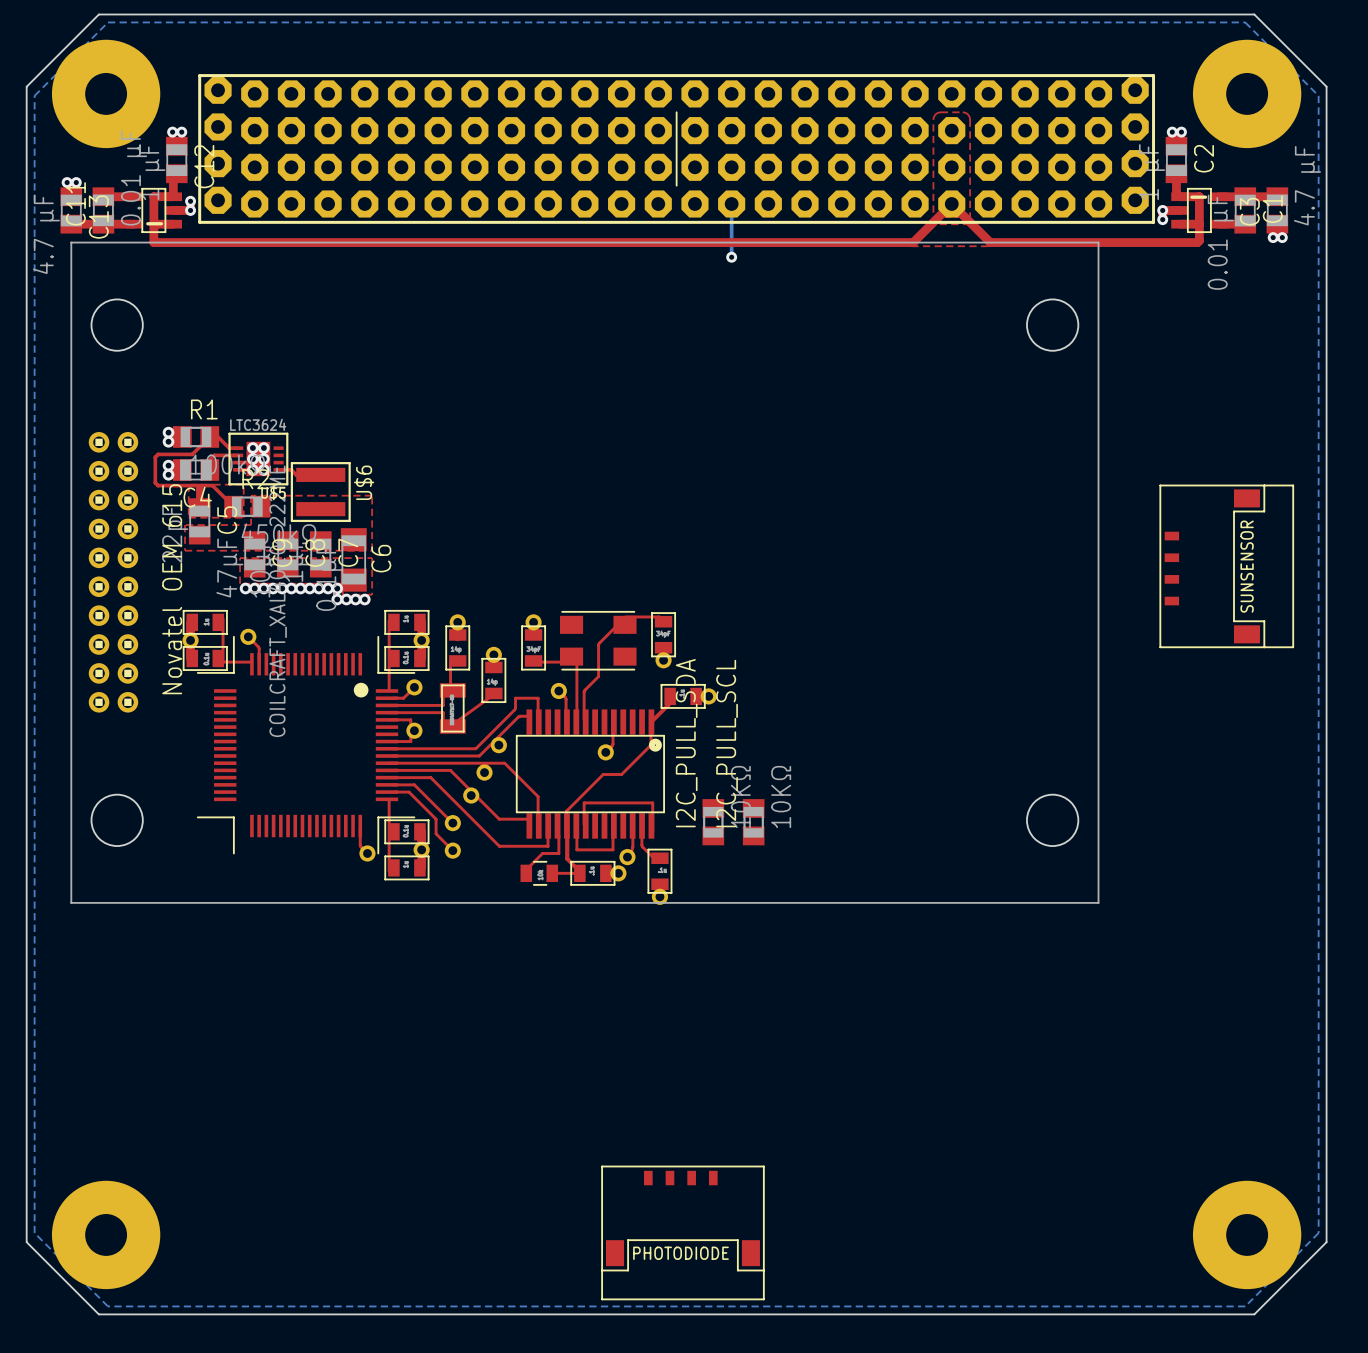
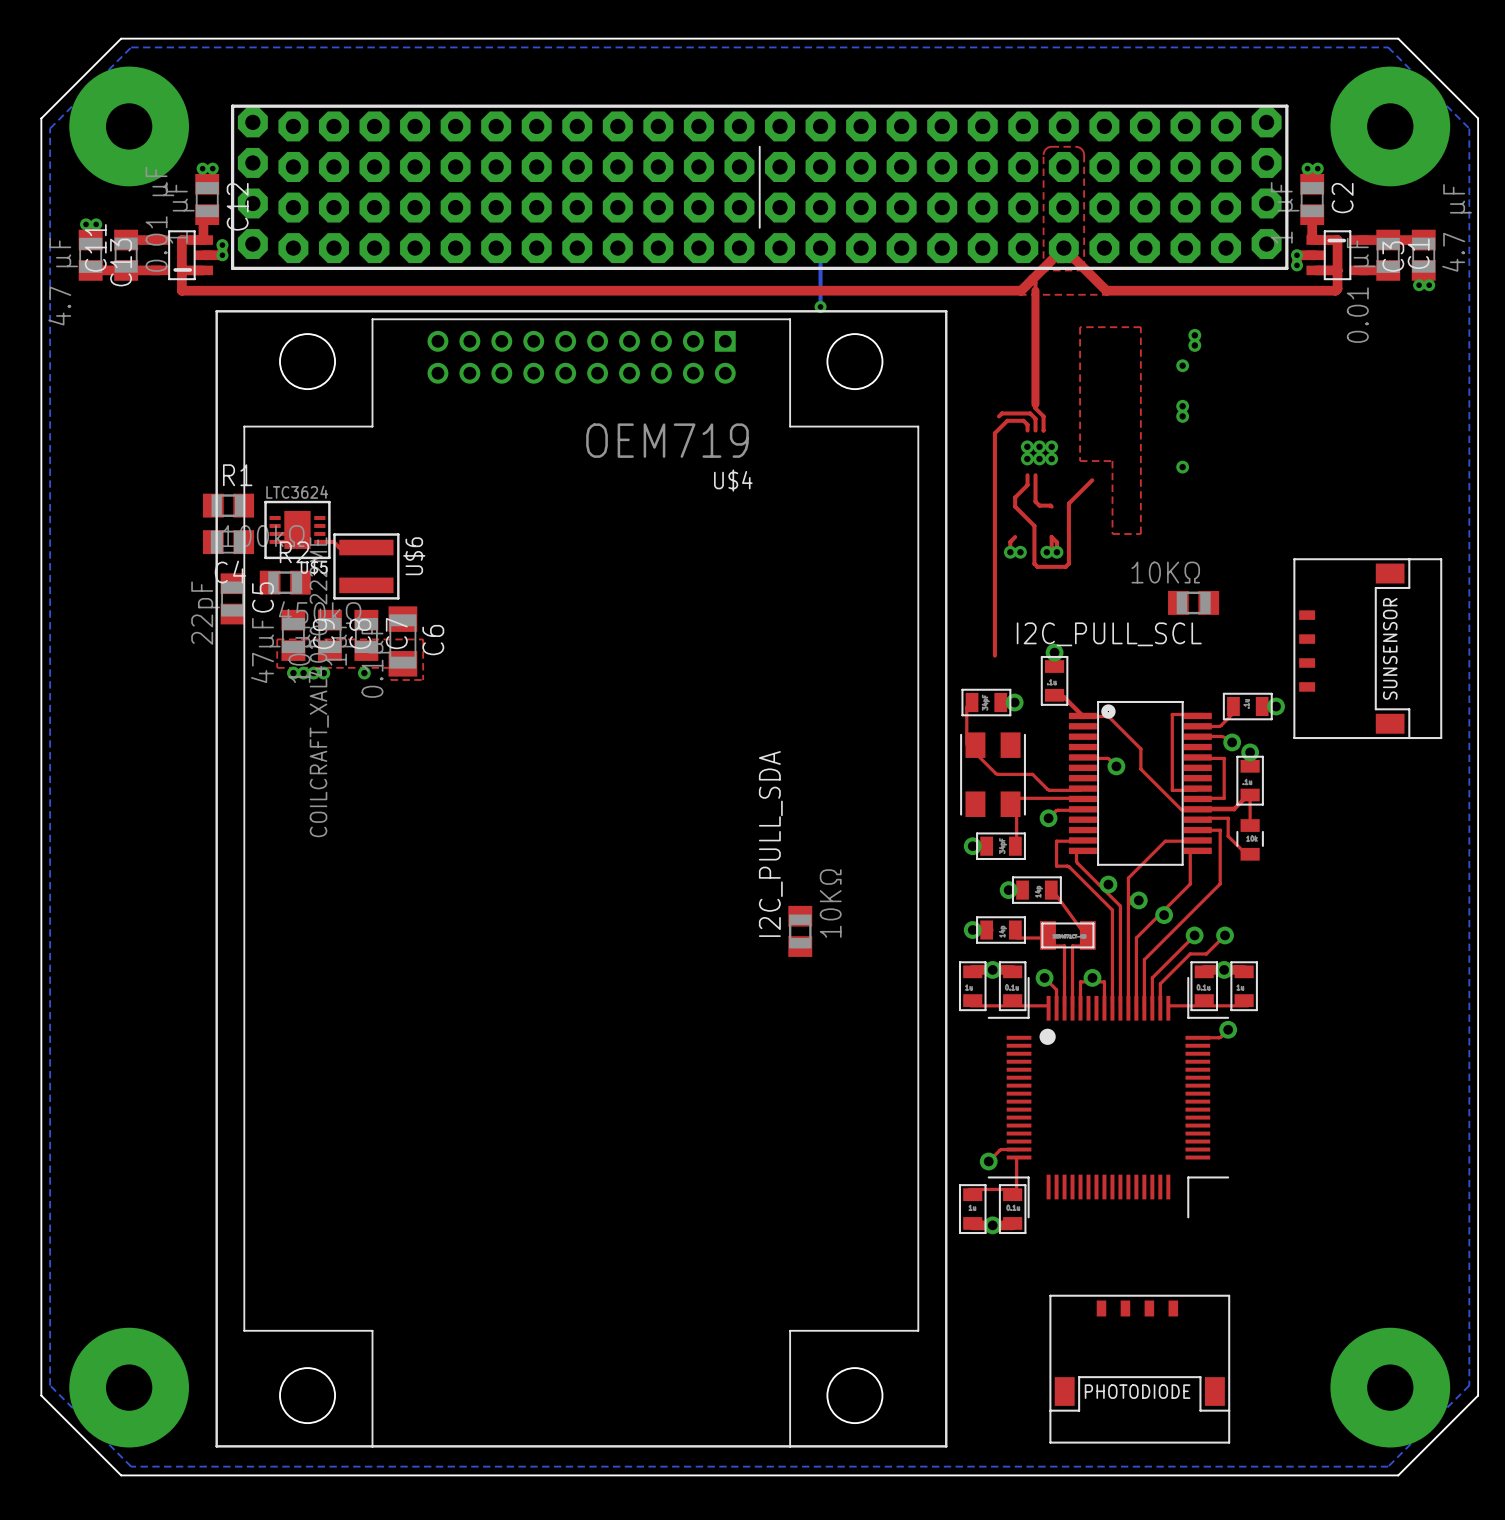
top track: none -> (1032, 279) (1035, 282) (1035, 408) (1043, 416) (1043, 430)
top zone outline: none -> (1080, 327) (1140, 327) (1140, 534) (1112, 534) (1112, 461) (1080, 461) (1080, 327)
via: none -> (1194, 335)
via: none -> (1194, 345)
via: none -> (1182, 365)
via: none -> (1182, 406)
top track: none -> (998, 416) (1001, 413) (1030, 413) (1035, 418) (1035, 430)
via: none -> (1182, 416)
top track: none -> (1027, 430) (1027, 424) (1023, 420) (1007, 420) (994, 433) (994, 655)
via: none -> (1027, 446)
via: none -> (1039, 446)
via: none -> (1051, 446)
via: none -> (1027, 458)
via: none -> (1039, 458)
via: none -> (1051, 458)
via: none -> (1182, 467)
top track: none -> (1027, 475) (1027, 485) (1015, 497) (1015, 506) (1034, 525) (1034, 563) (1037, 566) (1065, 566) (1068, 563) (1068, 503) (1092, 480)
top track: none -> (1035, 475) (1035, 501) (1039, 505) (1051, 506)
via: (168, 432) -> none
via: (168, 441) -> none
top track: (238, 448) (229, 448) (218, 436) (209, 436) (192, 454) (158, 454) (155, 457) (155, 482) (158, 485) (212, 485) (233, 506) -> none
via: (252, 448) -> none
via: (263, 448) -> none
top track: (238, 455) (214, 455) (210, 459) (209, 470) -> none
via: (252, 459) -> none
via: (263, 459) -> none
via: (168, 465) -> none
top track: none -> (1015, 537) (1010, 541) (1010, 552) (1020, 552)
via: (252, 470) -> none
via: (263, 470) -> none
via: (168, 474) -> none
via: none -> (1010, 552)
via: none -> (1020, 552)
top track: none -> (1046, 552) (1051, 547) (1051, 537) (1056, 542) (1056, 552)
via: none -> (1046, 552)
via: none -> (1056, 552)
top zone outline: (188, 484) (243, 484) (243, 517) (188, 517) (188, 484) -> none
top track: (201, 485) (199, 487) (199, 507) -> none
top zone outline: (251, 495) (372, 495) (372, 550) (185, 550) (185, 525) (251, 525) (251, 495) -> none
part: (584, 572) -> none
via: (245, 588) -> none
via: (291, 588) -> none
via: (300, 588) -> none
via: (309, 588) -> none
via: (328, 588) -> none
via: (337, 588) -> none
via: (337, 599) -> none
via: (346, 599) -> none
via: (355, 599) -> none
via: (364, 599) -> none
top track: none -> (1054, 696) (1064, 696) (1084, 716) (1108, 716) (1140, 748) (1140, 769) (1181, 809) (1234, 809) (1247, 796) (1250, 796)
top track: (668, 696) (668, 705) (650, 723) (650, 745) (621, 774) (603, 774) (566, 811) (566, 858) (578, 873) -> none
I2C_PULL_SCL name position: I2C_PULL_SCL (727, 743) -> I2C_PULL_SCL (1109, 634)
part: (449, 757) -> none
U$4: none -> OEM719 (581, 878)
I2C_PULL_SCL value position: 10KΩ (781, 796) -> 10KΩ (1165, 572)
I2C_PULL_SCL rotation: 0° (753, 822) -> 90° clockwise (1193, 602)
I2C_PULL_SCL position: (753, 822) -> (1193, 602)
part: none -> (1121, 939)
PHOTODIODE position: (682, 1232) -> (1139, 1369)

